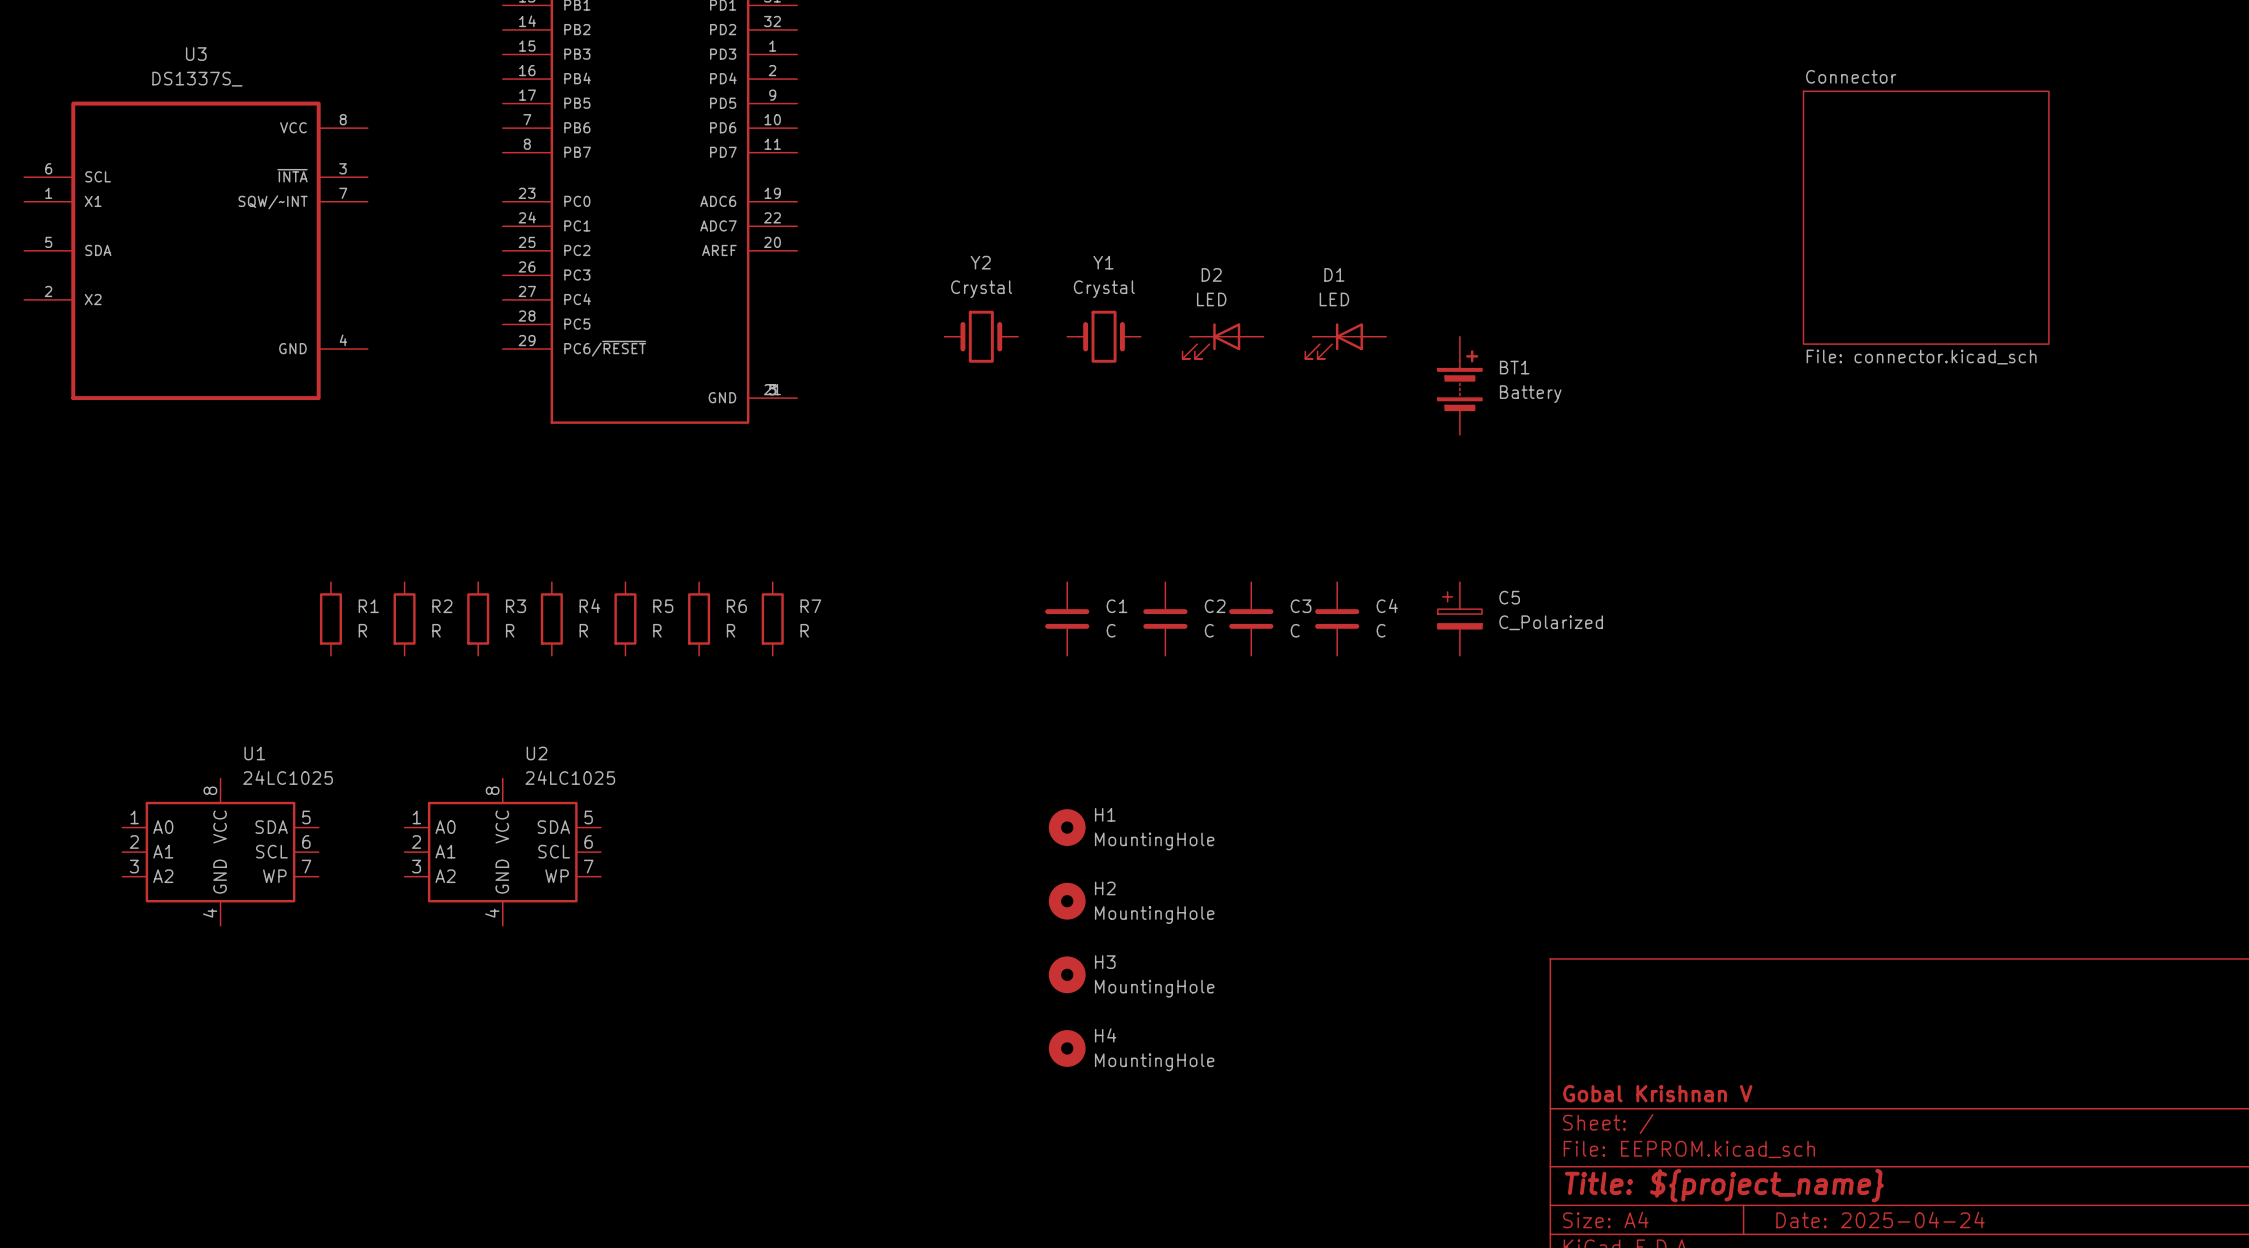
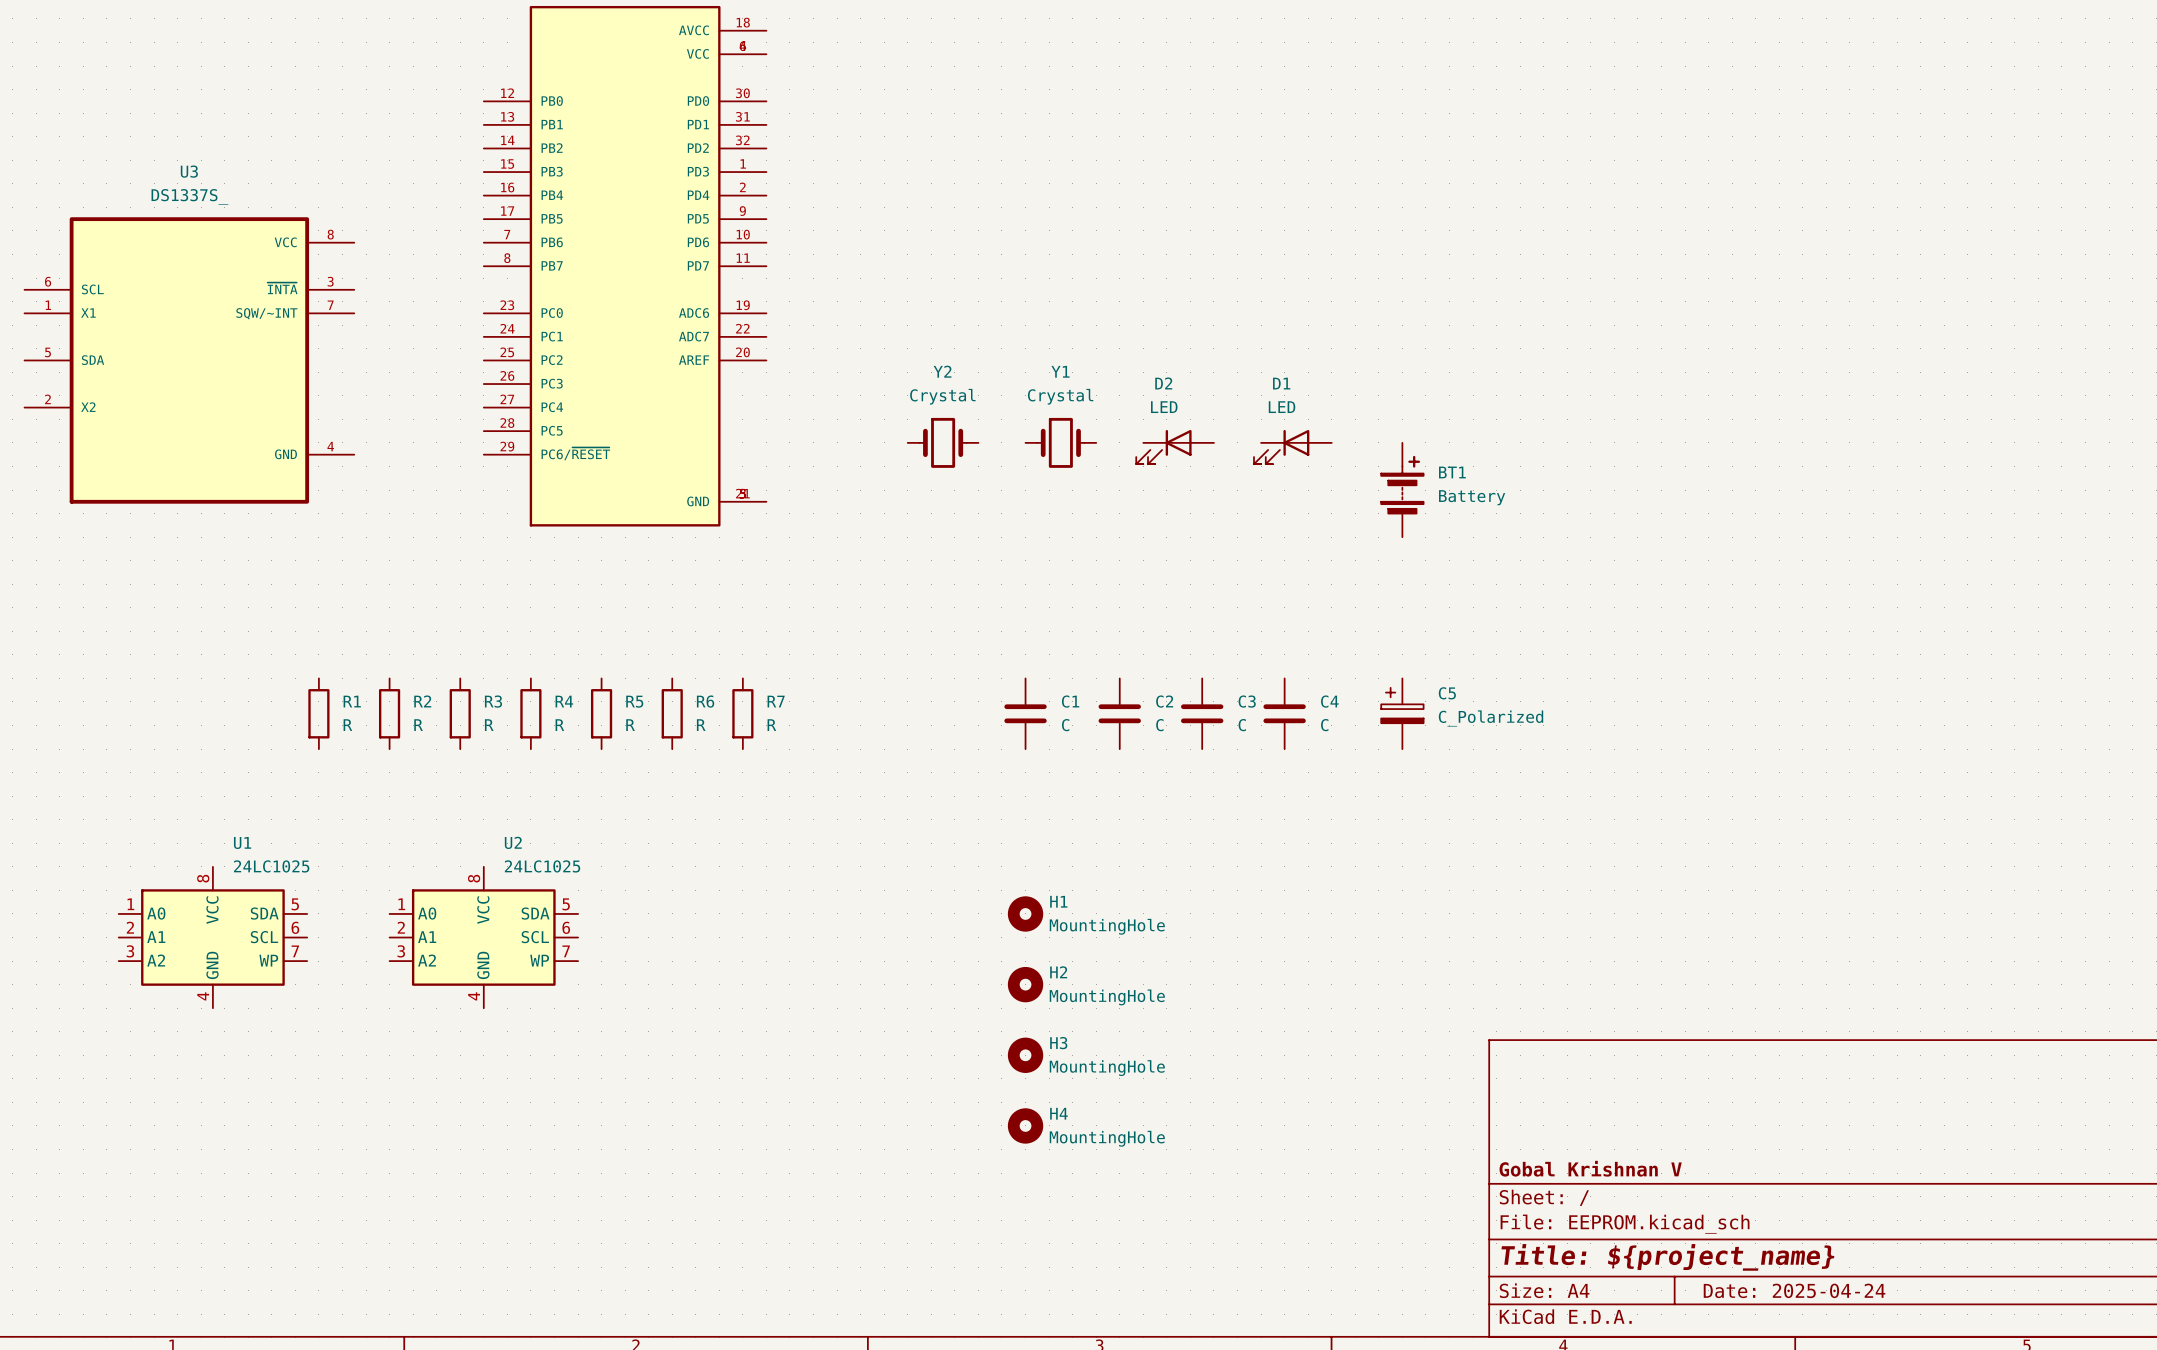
sheet Connector: File: connector.kicad_sch (1926, 217) -> none

